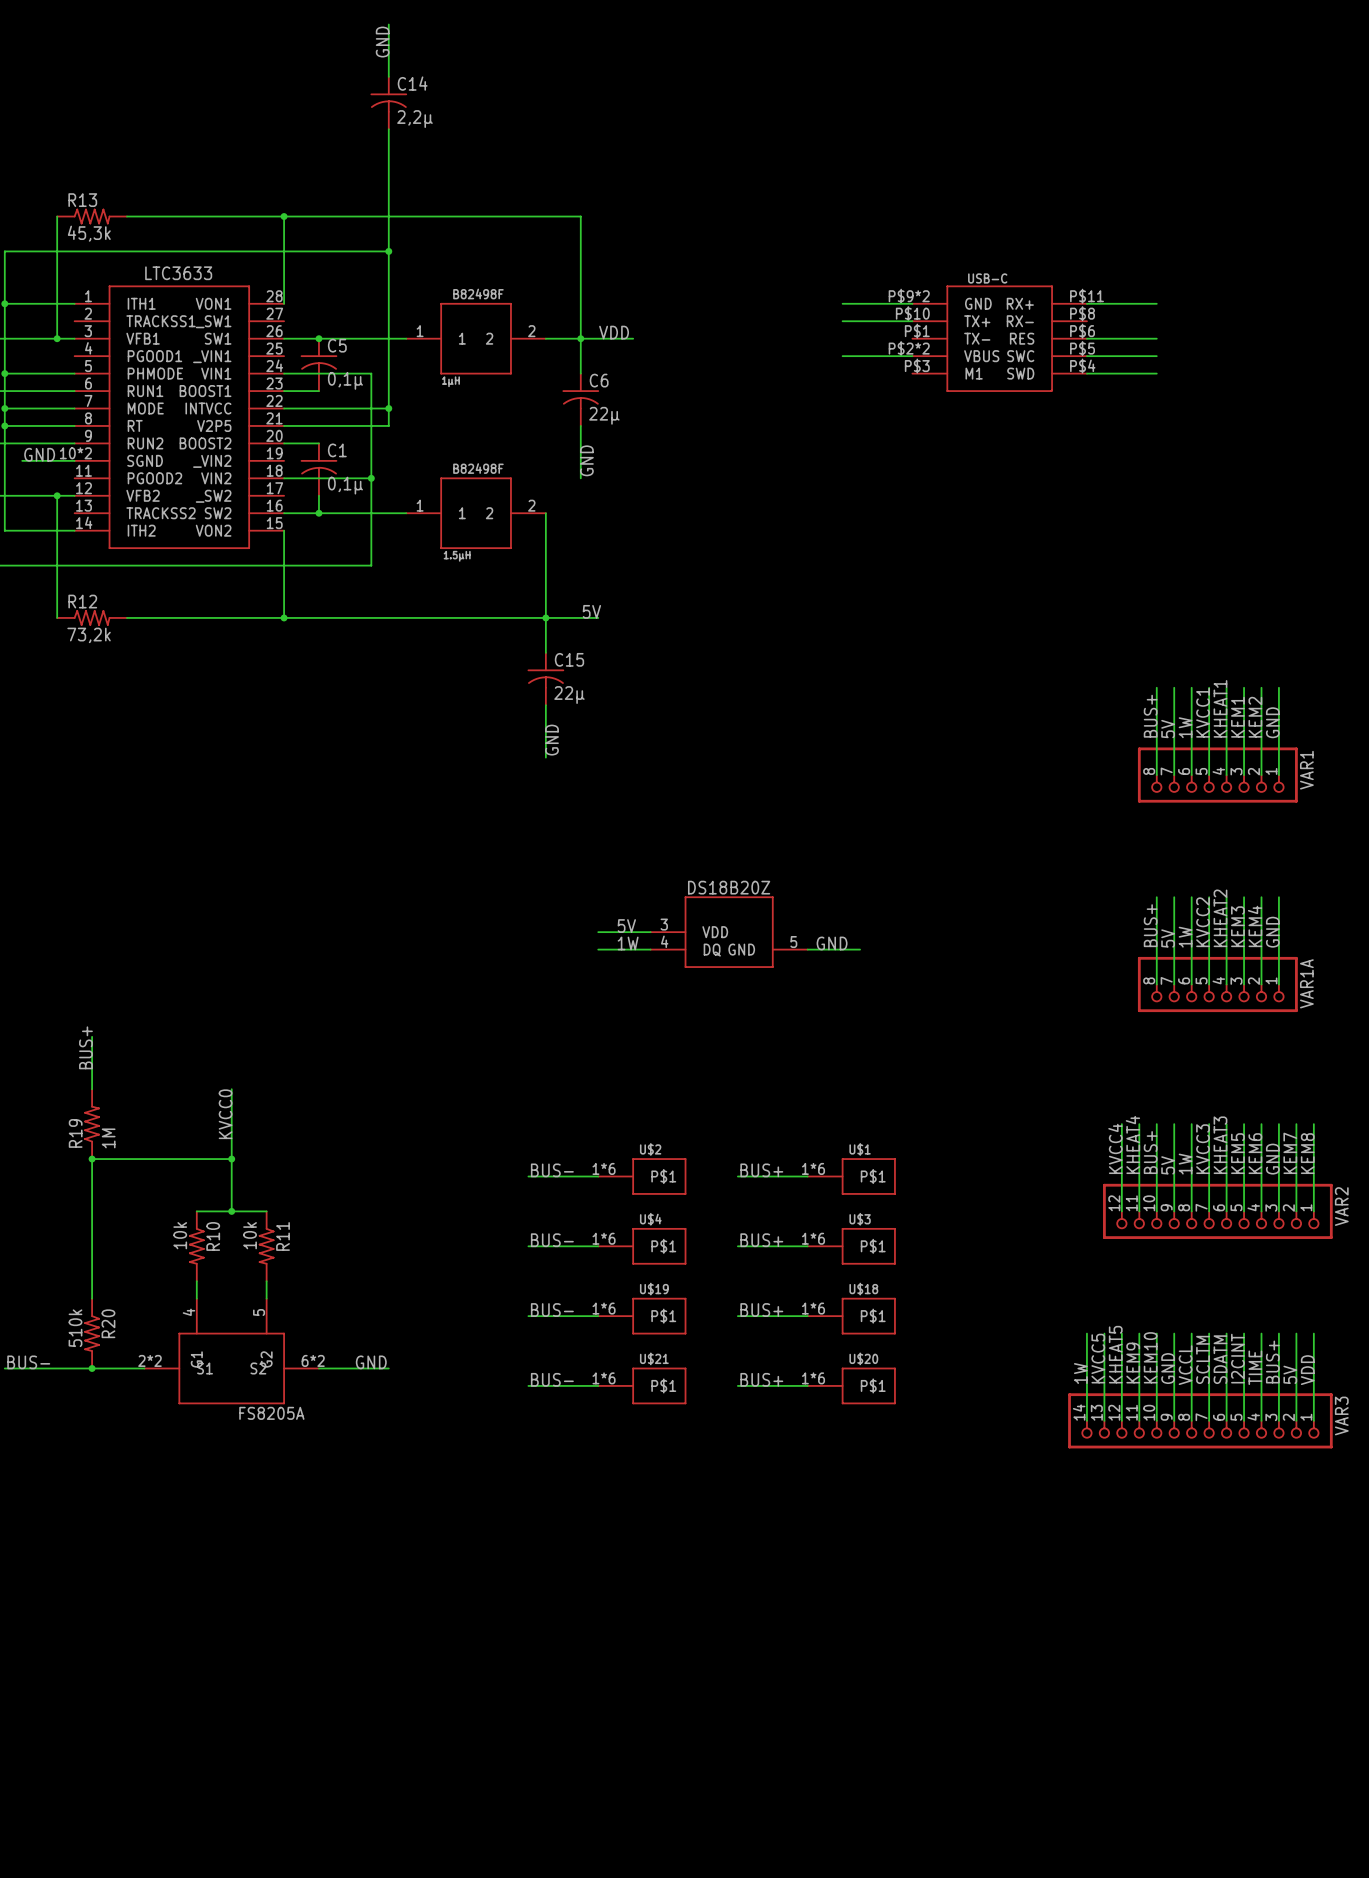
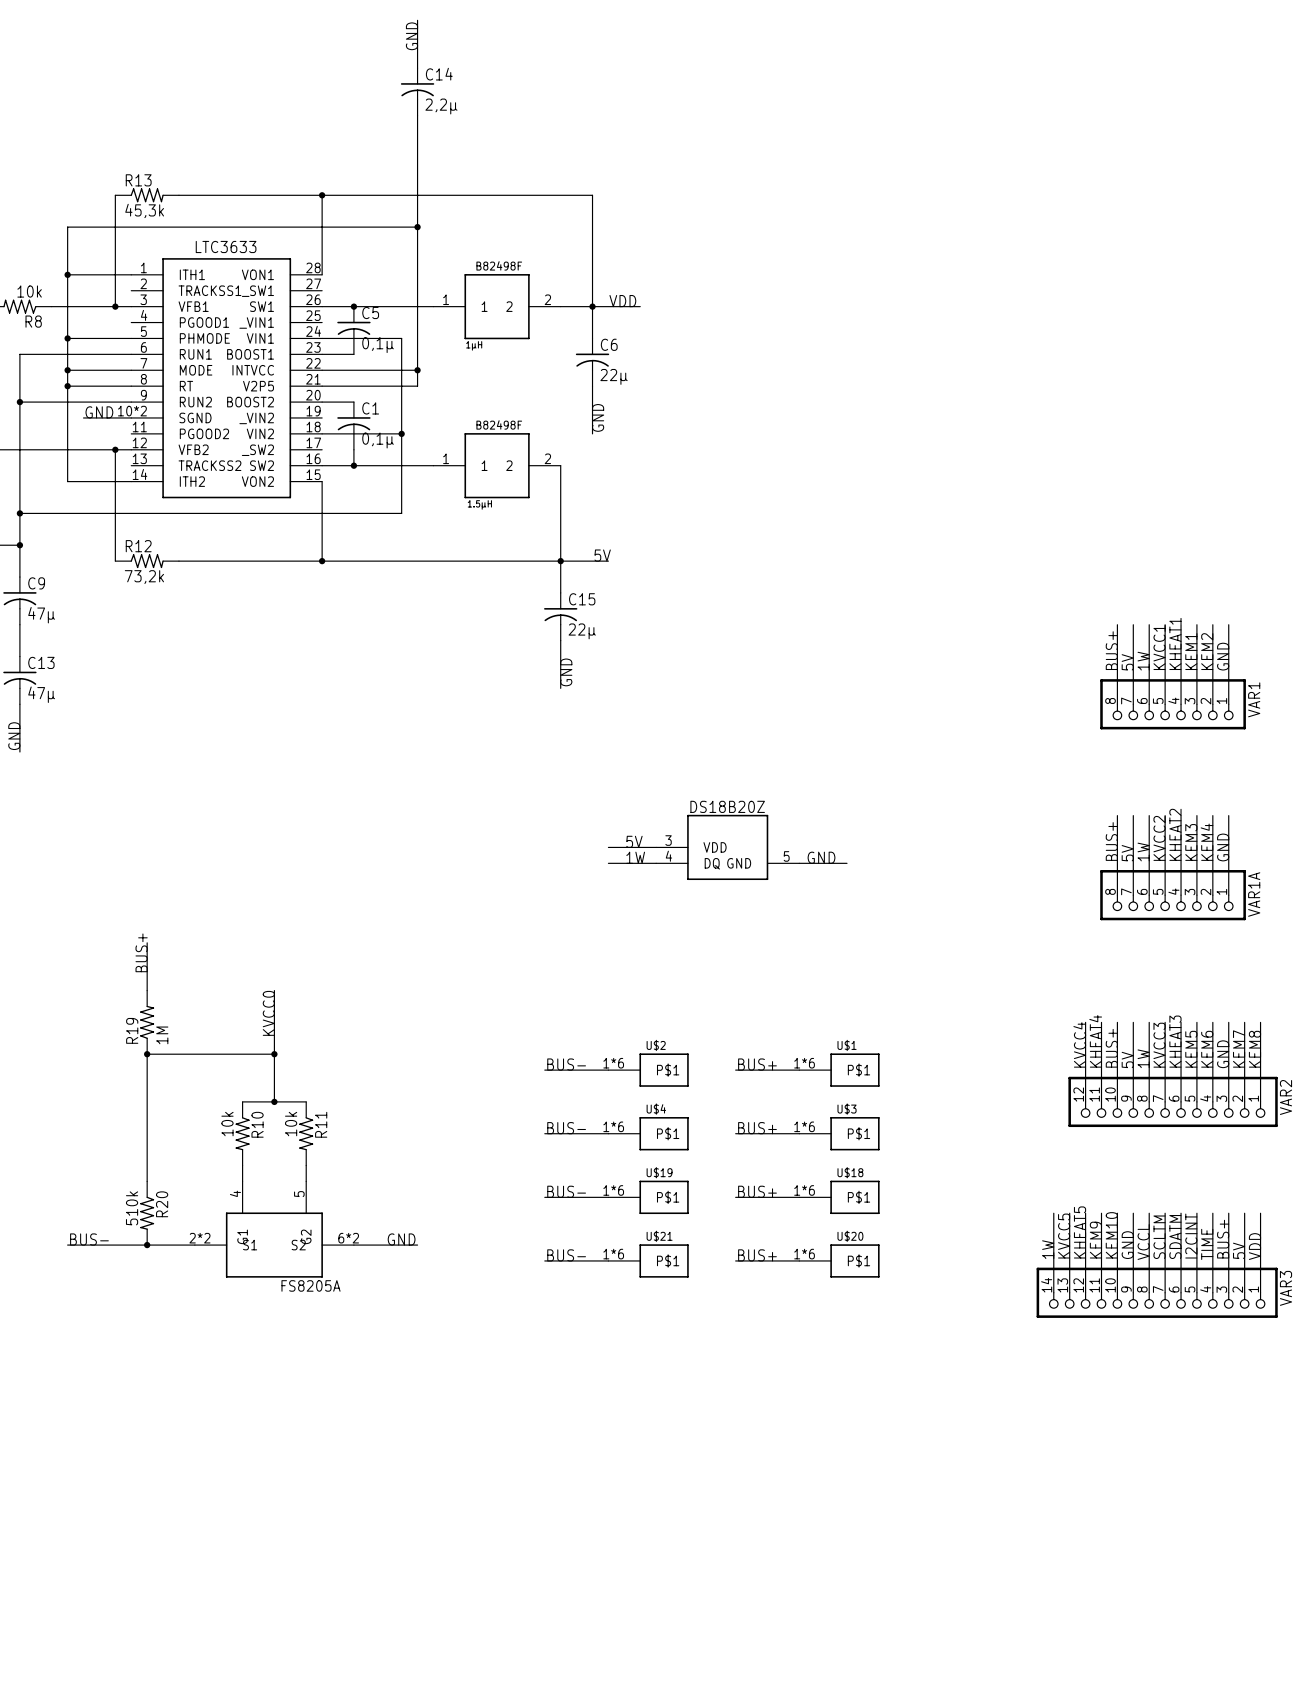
wire: (842, 303) (912, 303) -> none
wire: (1086, 303) (1156, 303) -> none
wire: (842, 321) (912, 321) -> none
part: (999, 338) -> none
wire: (1086, 338) (1156, 338) -> none
wire: (842, 356) (912, 356) -> none
wire: (1086, 356) (1156, 356) -> none
wire: (1086, 373) (1156, 373) -> none

